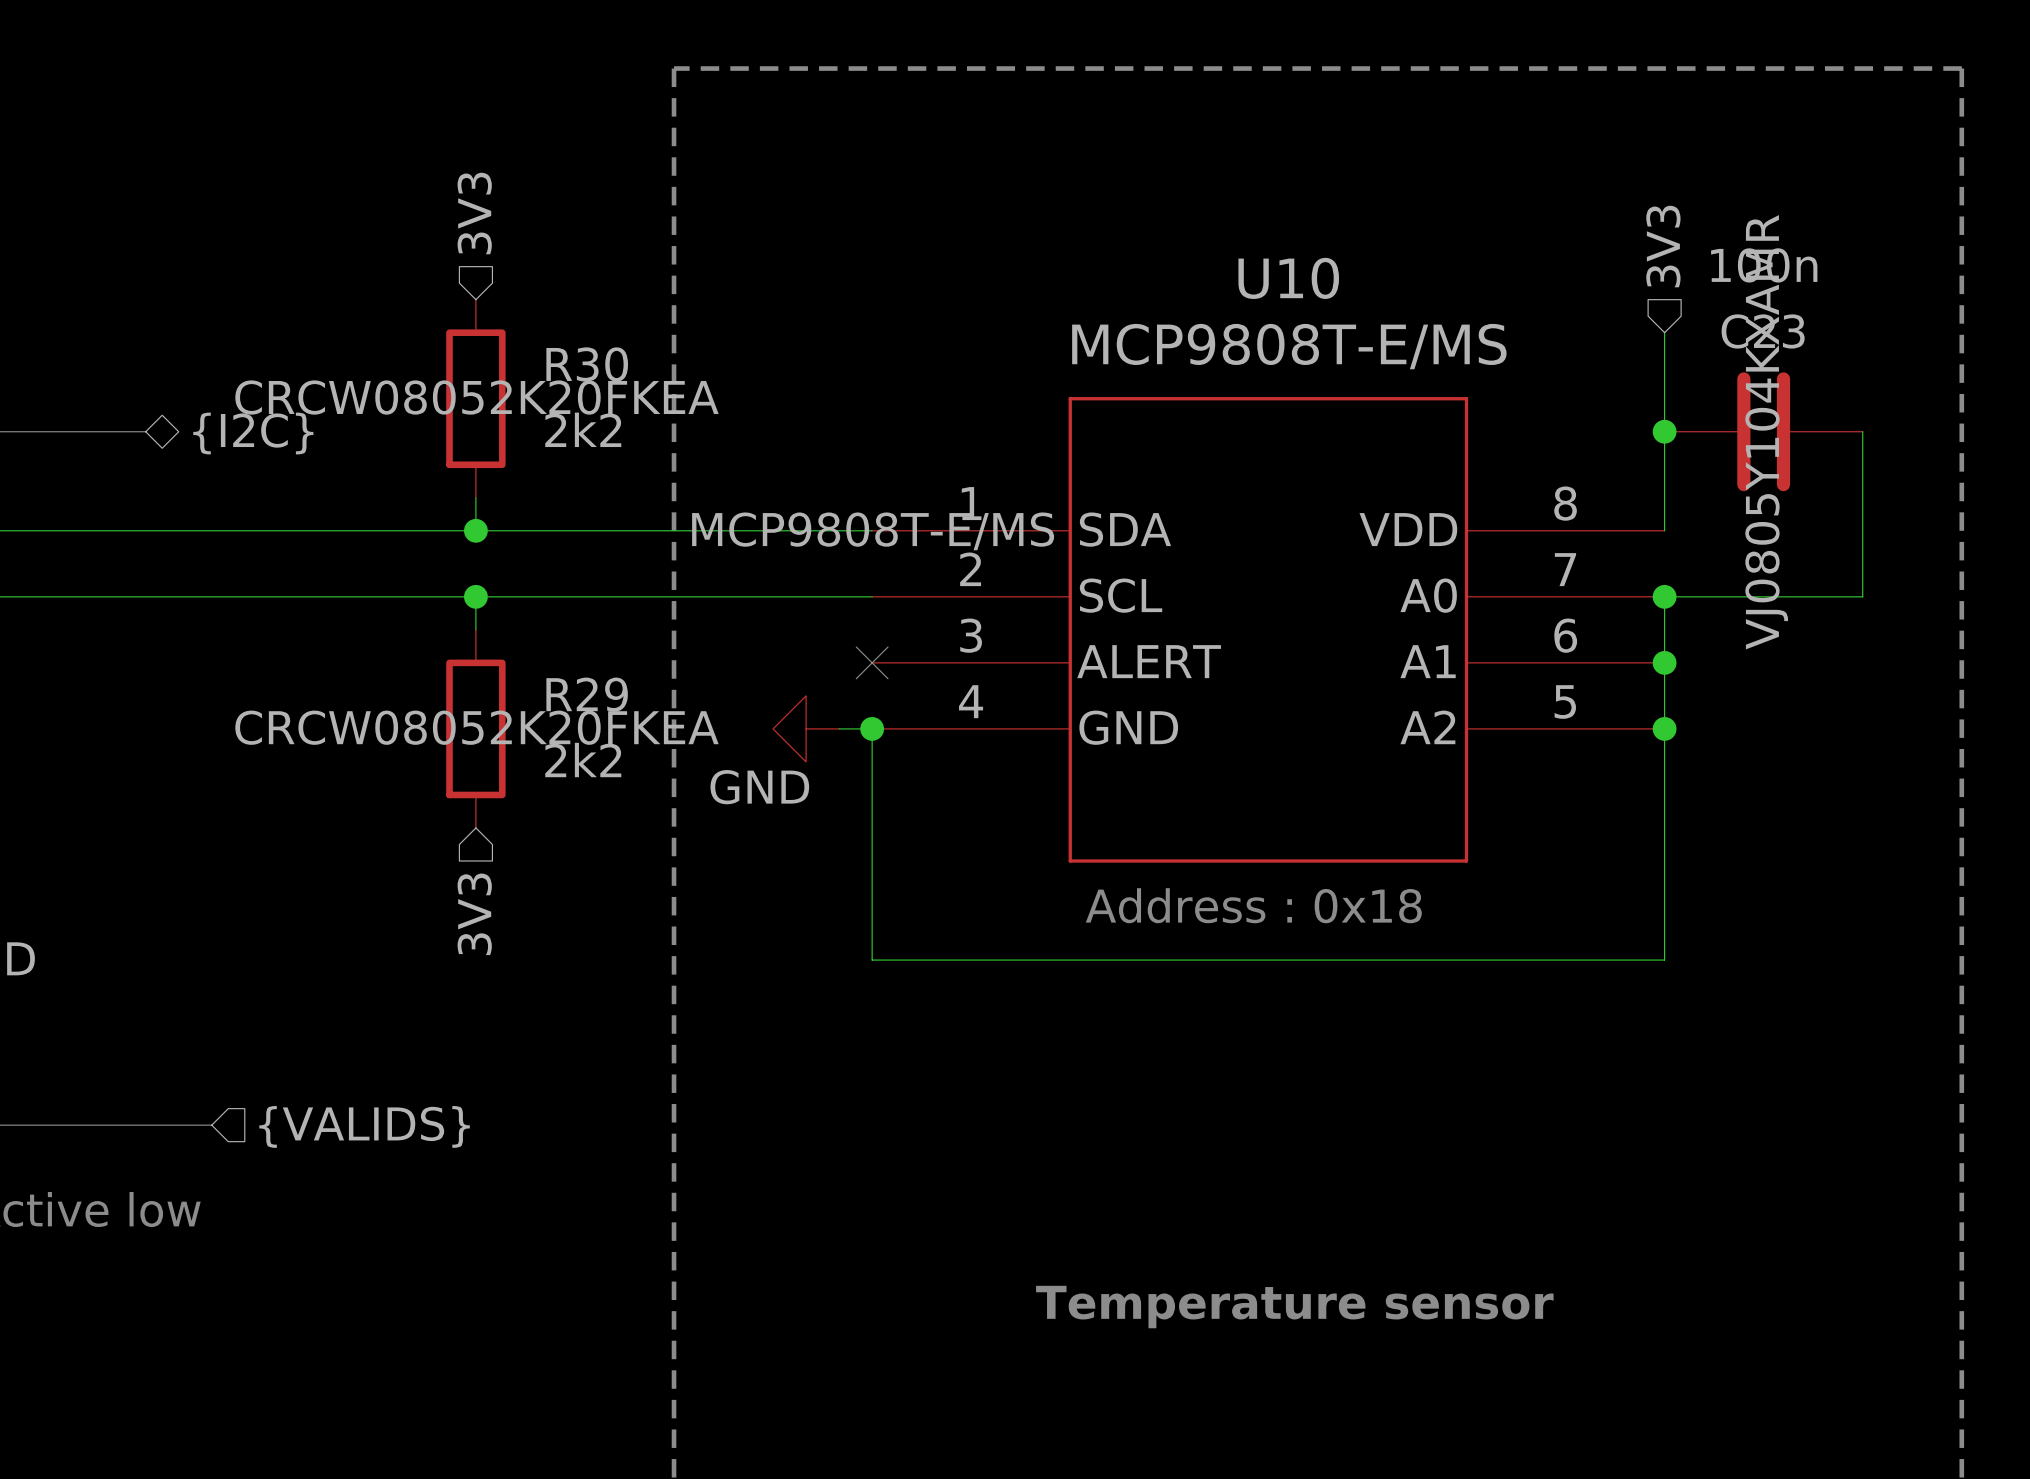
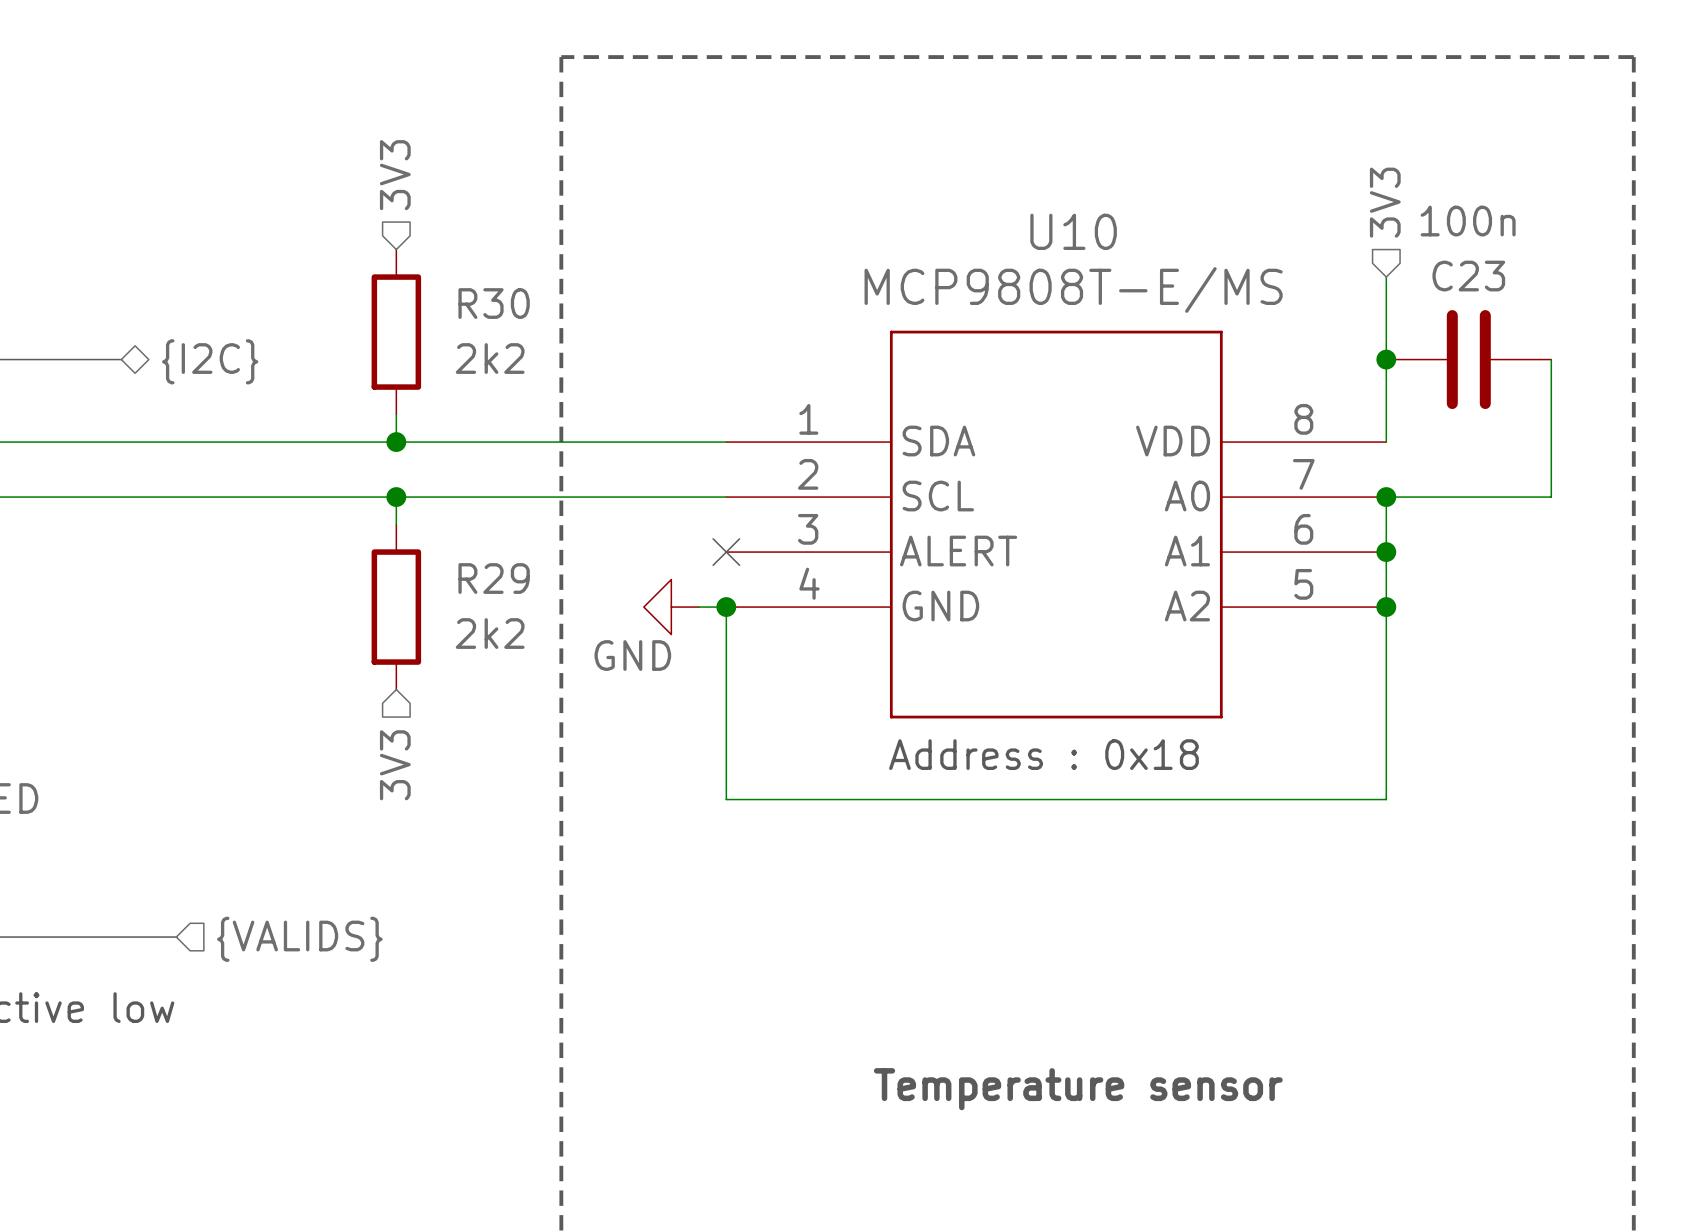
R30 text: CRCW08052K20FKEA (476, 397) -> none
C23 text: VJ0805Y104KXAMR (1766, 432) -> none
U10 text: MCP9808T-E/MS (873, 531) -> none
R29 text: CRCW08052K20FKEA (476, 727) -> none

